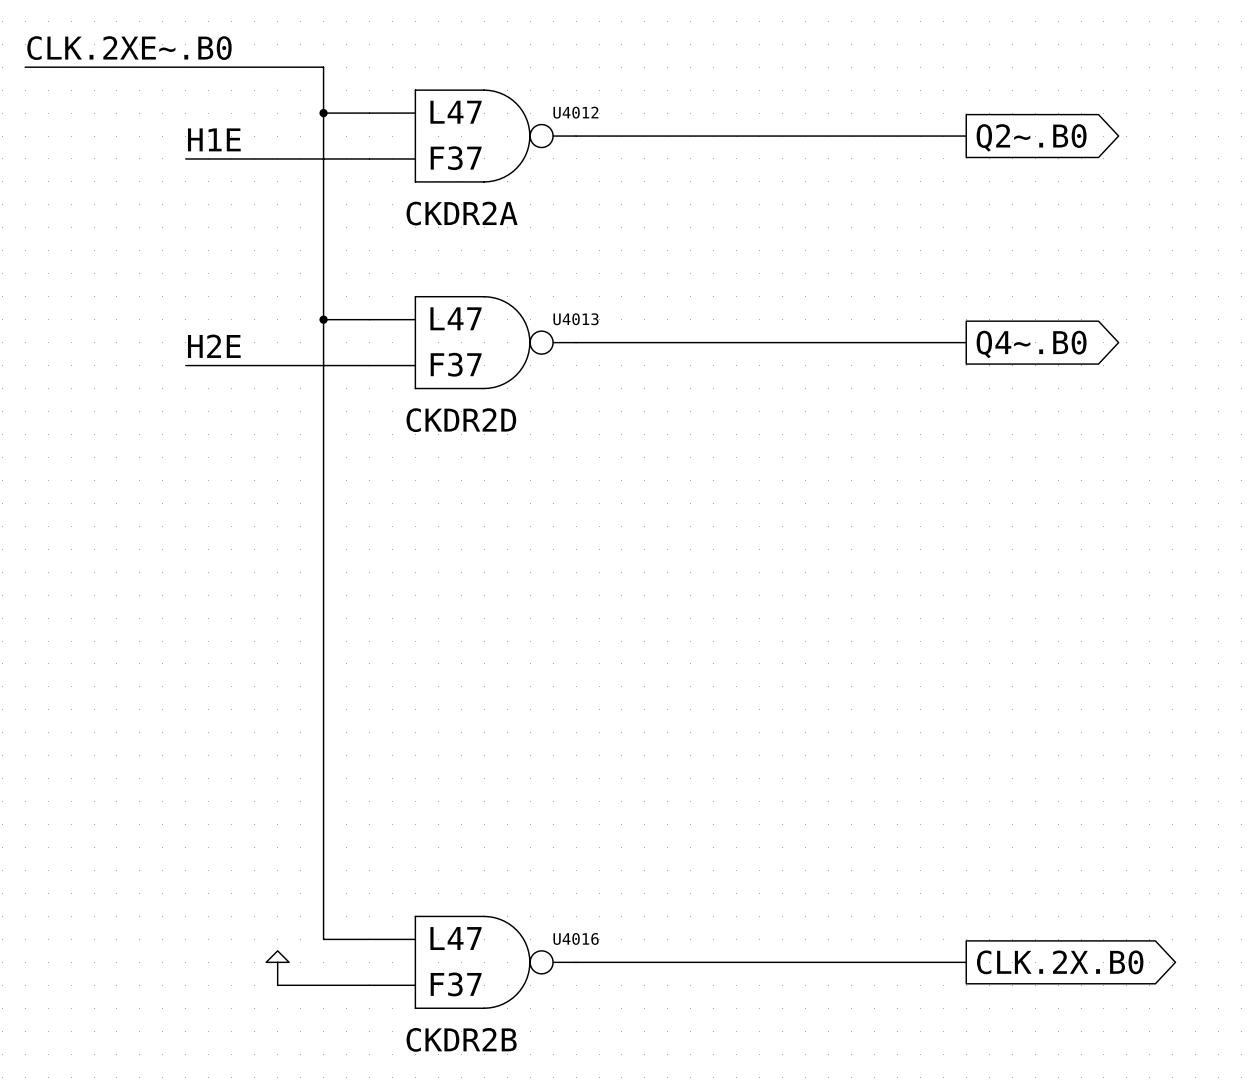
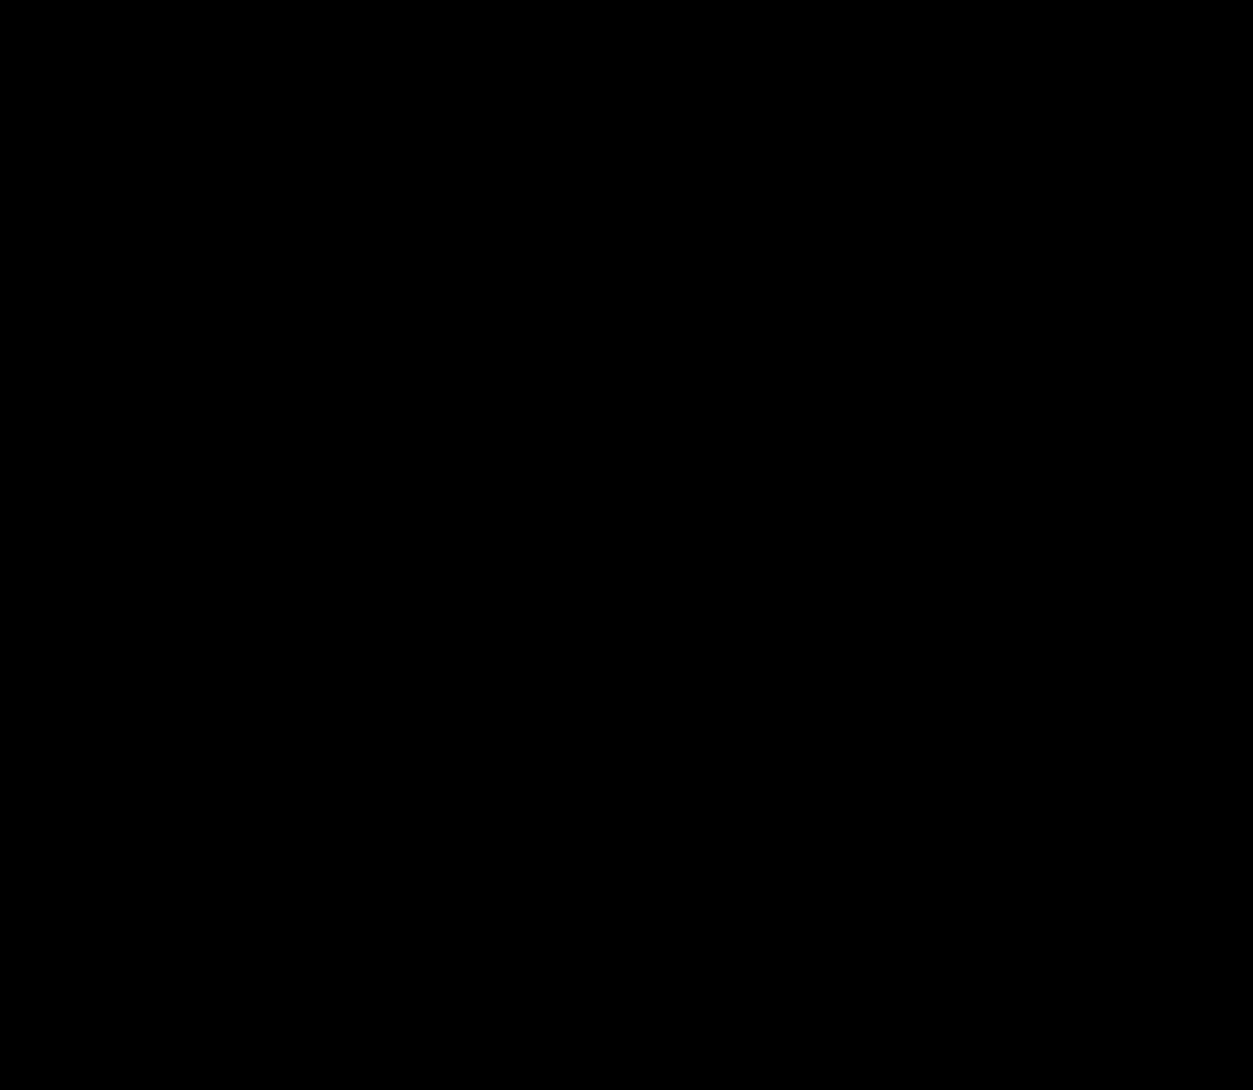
label: CLK.2XE~.B0 (129, 48) -> none
wire: (25, 67) (323, 67) (323, 939) (369, 939) -> none
wire: (323, 113) (369, 113) -> none
junction: (323, 113) -> none
U4012: F37 (472, 136) -> none
wire: (576, 136) (966, 136) -> none
global label: Q2~.B0 (1031, 137) -> none
label: H1E (214, 139) -> none
wire: (185, 158) (369, 158) -> none
wire: (323, 319) (369, 319) -> none
junction: (323, 319) -> none
U4013: F37 (472, 342) -> none
wire: (576, 342) (966, 342) -> none
global label: Q4~.B0 (1031, 344) -> none
label: H2E (214, 346) -> none
wire: (185, 365) (369, 365) -> none
U4016: F37 (472, 962) -> none
wire: (576, 962) (966, 962) -> none
global label: CLK.2X.B0 (1060, 962) -> none
power symbol: (277, 967) -> none
wire: (277, 985) (369, 985) -> none

